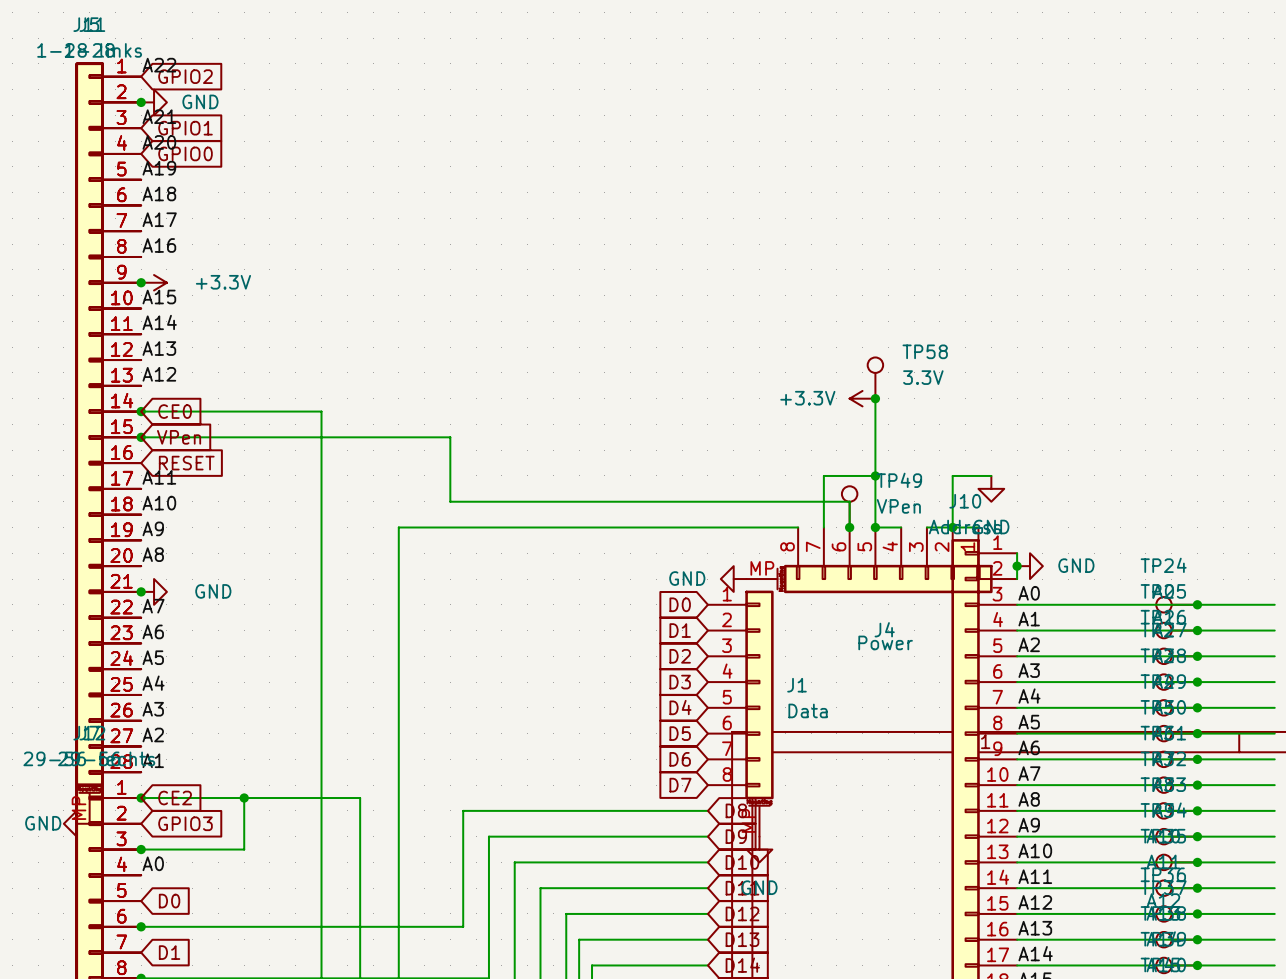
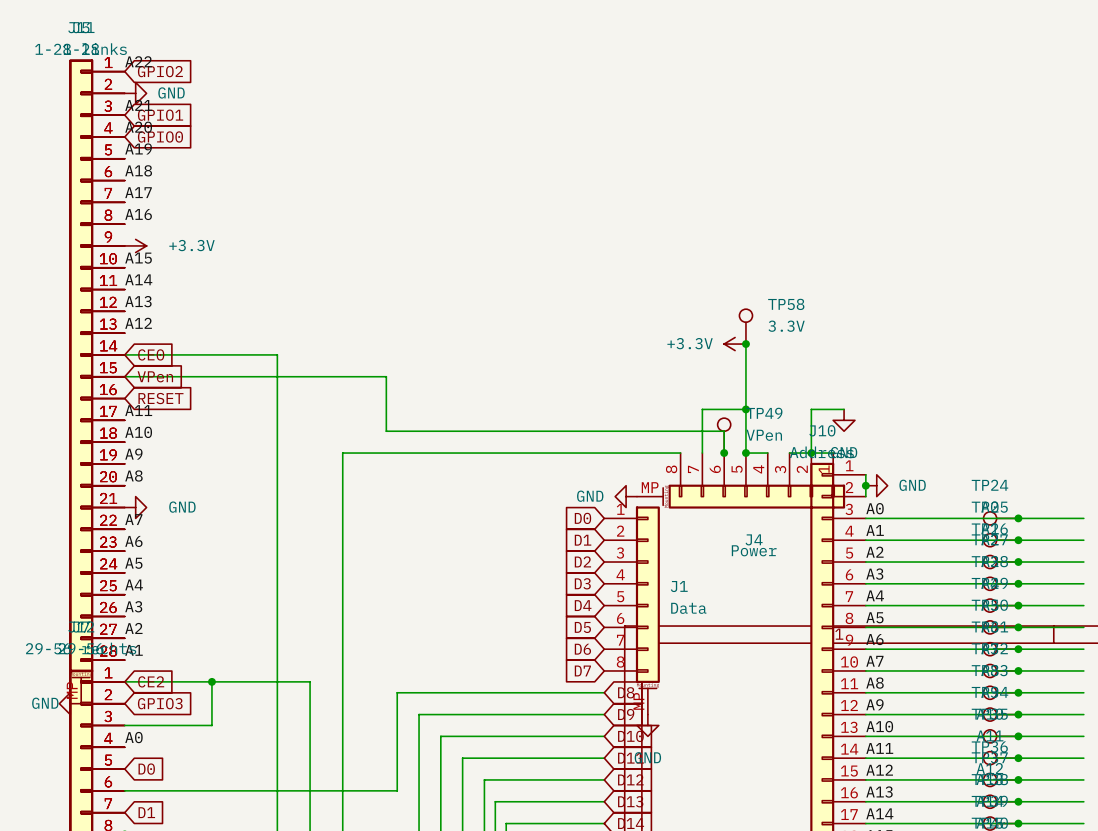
junction: (141, 102) -> none
junction: (141, 282) -> none
junction: (141, 411) -> none
junction: (141, 437) -> none
junction: (141, 591) -> none
junction: (141, 798) -> none
junction: (141, 849) -> none
junction: (141, 926) -> none

